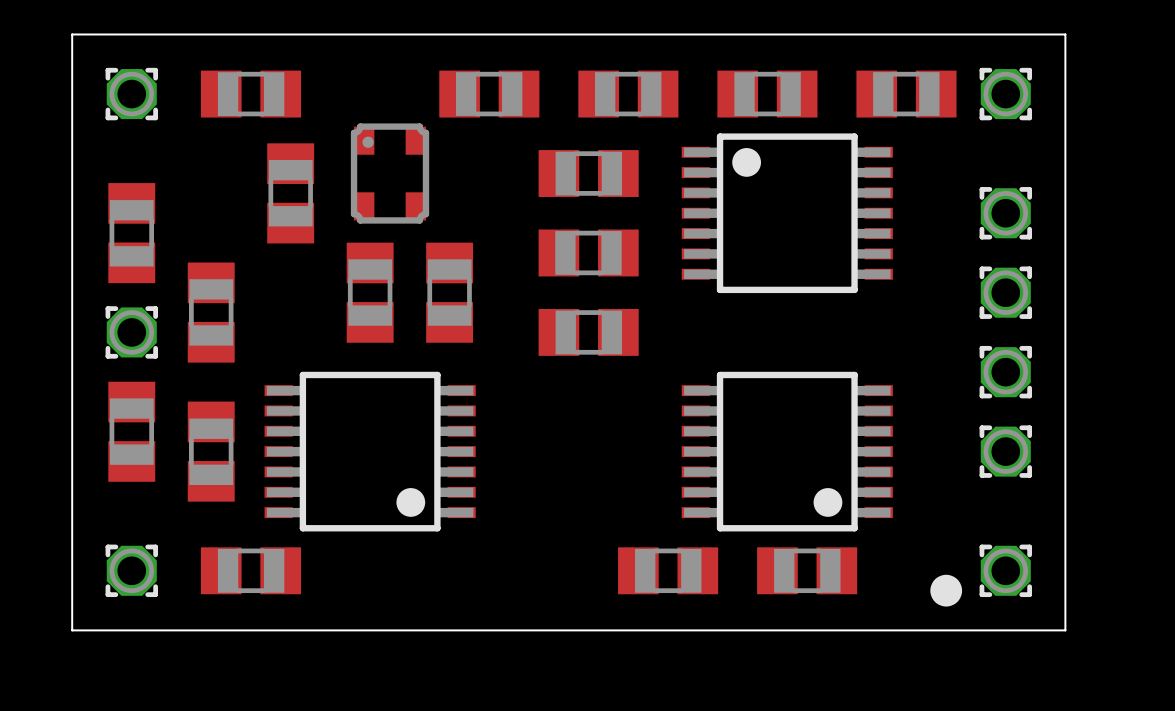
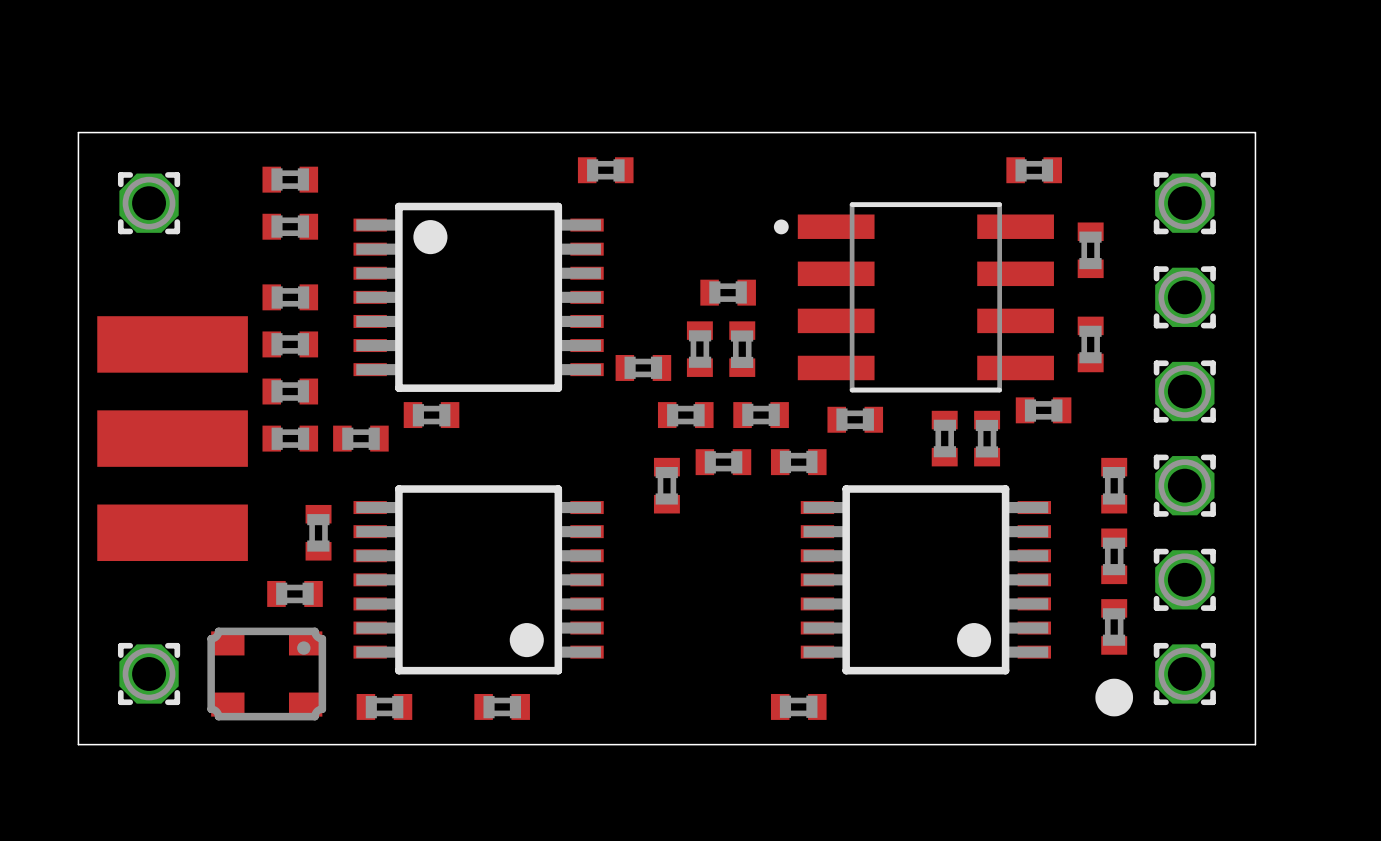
part: (131, 94) -> none
part: (250, 94) -> none
part: (489, 94) -> none
part: (628, 94) -> none
part: (767, 94) -> none
part: (906, 94) -> none
part: (1005, 94) -> none
board edge: (72, 113) (72, 34) (1065, 34) (1065, 113) -> (78, 132) (1255, 132)
part: none -> (605, 170)
part: none -> (1034, 170)
part: none -> (290, 179)
part: none -> (149, 203)
part: (390, 173) -> none
part: (588, 173) -> none
part: none -> (1184, 203)
part: none -> (290, 226)
part: (290, 193) -> none
part: (787, 213) -> none
part: none -> (1090, 250)
part: (1005, 213) -> none
part: (131, 233) -> none
part: none -> (728, 292)
part: none -> (290, 297)
part: none -> (478, 297)
part: (588, 252) -> none
part: none -> (913, 297)
part: none -> (1184, 297)
part: none -> (290, 344)
part: (370, 292) -> none
part: (449, 292) -> none
part: none -> (1090, 344)
part: (1005, 292) -> none
part: none -> (699, 349)
part: none -> (742, 349)
part: (211, 312) -> none
part: none -> (643, 367)
part: (131, 332) -> none
part: none -> (290, 391)
part: (588, 332) -> none
part: none -> (1184, 391)
part: none -> (1043, 410)
part: none -> (431, 415)
part: none -> (685, 415)
part: none -> (761, 415)
part: none -> (855, 419)
part: none -> (172, 438)
part: none -> (290, 438)
part: none -> (360, 438)
part: none -> (944, 438)
part: none -> (987, 438)
part: (1005, 372) -> none
part: none -> (723, 462)
part: none -> (798, 462)
part: none -> (666, 485)
part: none -> (1114, 485)
part: none -> (1184, 485)
part: (131, 431) -> none
part: (211, 451) -> none
part: none -> (318, 532)
part position: (370, 451) -> (478, 579)
part position: (787, 451) -> (925, 579)
part: (1005, 451) -> none
part: none -> (1114, 556)
part: none -> (1184, 579)
part: none -> (294, 593)
part: none -> (1114, 626)
part footprint: [200, 547, 302, 595] -> [207, 627, 327, 721]
part footprint: [618, 547, 719, 595] -> [770, 693, 827, 720]
part: (807, 570) -> none
part: none -> (384, 706)
part: none -> (502, 706)

